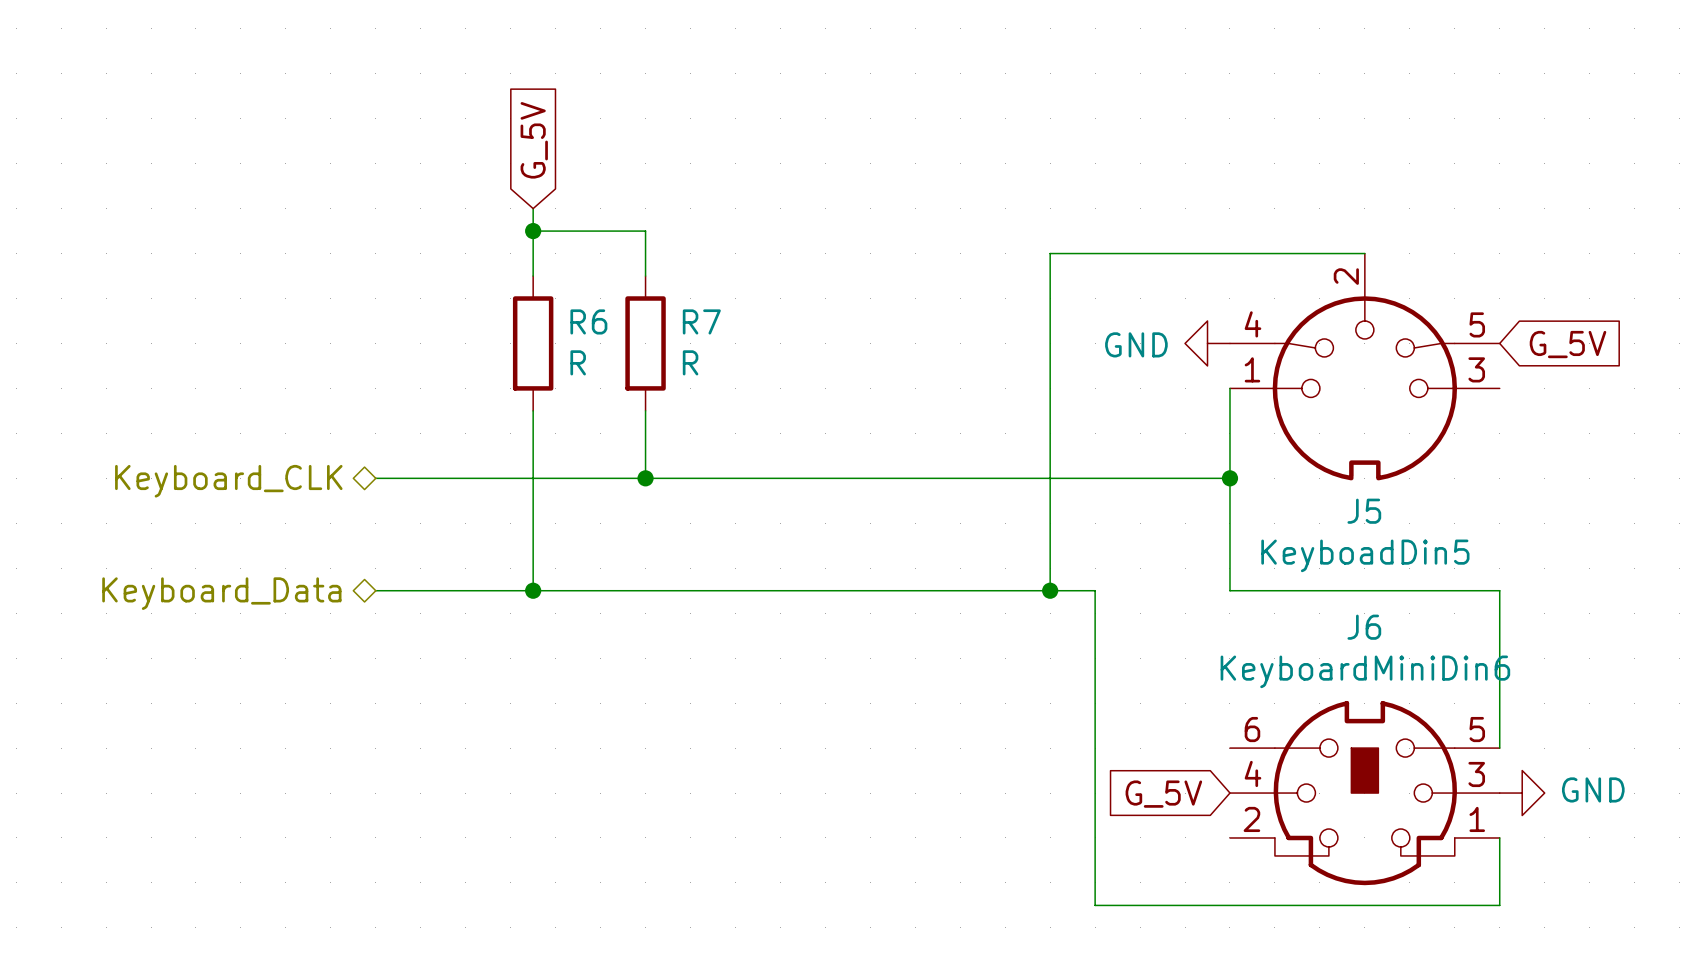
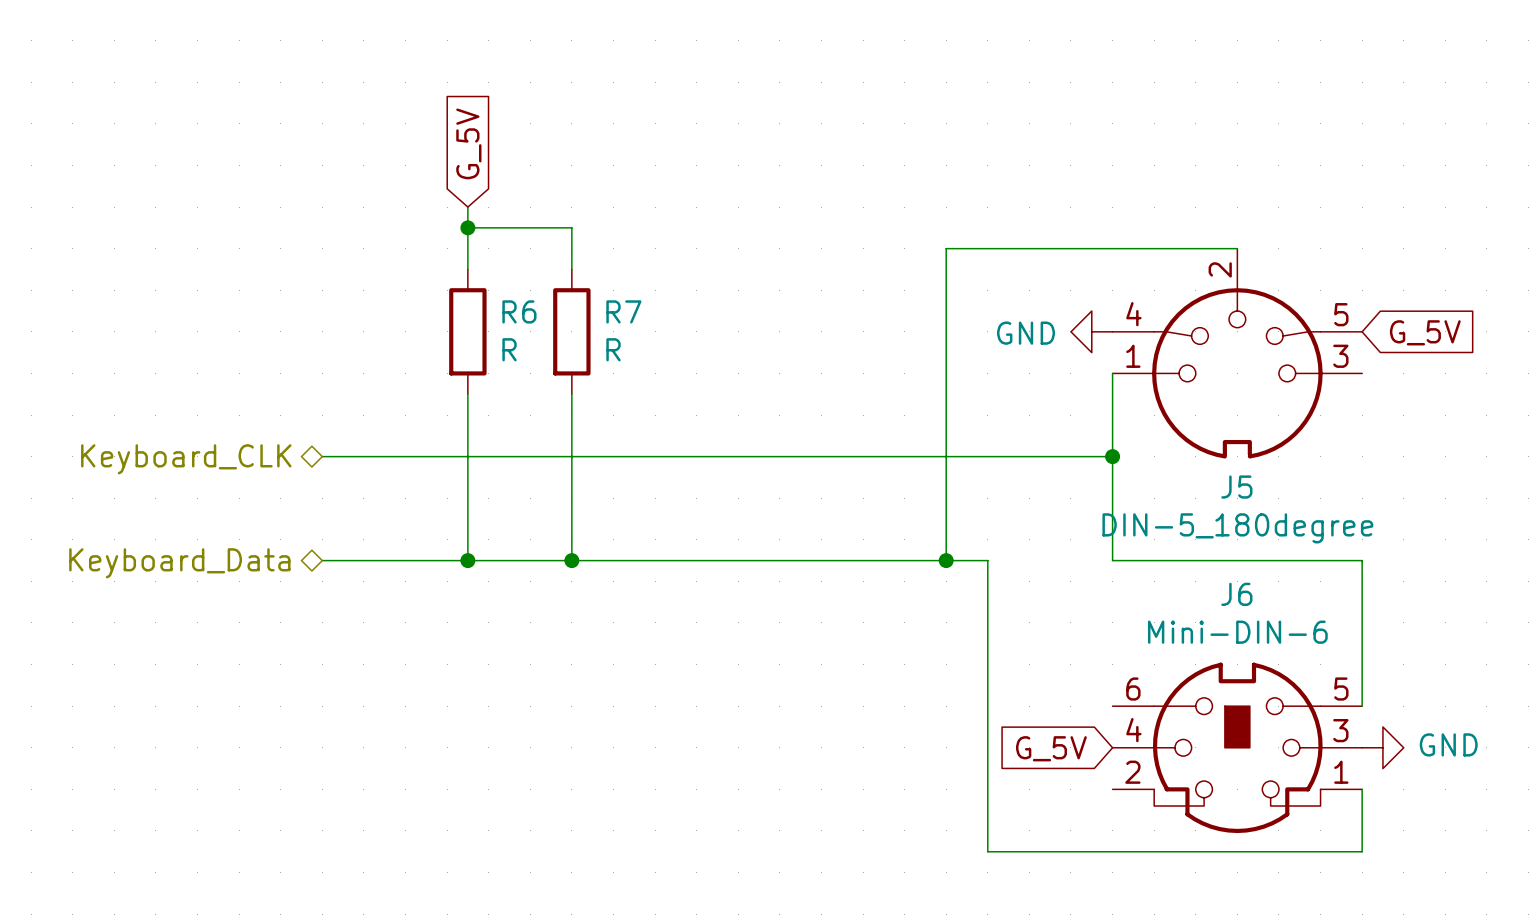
wire: none -> (571, 456) (571, 560)
junction: (645, 478) -> none
J5 value: KeyboadDin5 (1365, 555) -> DIN-5_180degree (1237, 528)
junction: none -> (571, 560)
J6 value: KeyboardMiniDin6 (1365, 671) -> Mini-DIN-6 (1237, 632)

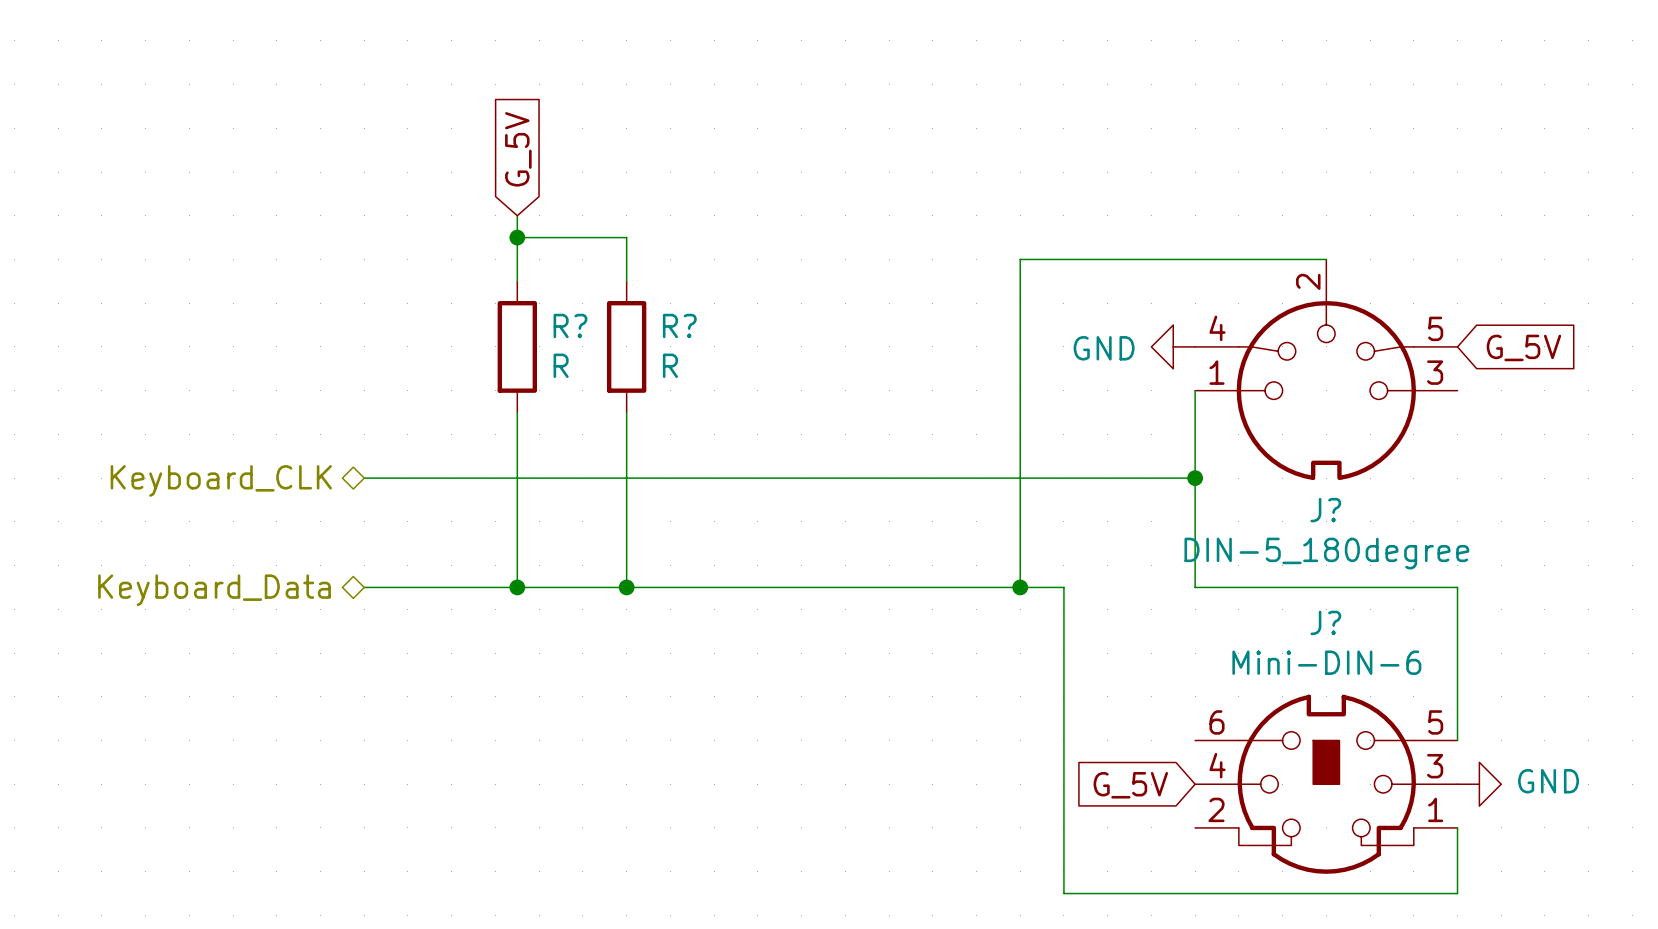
R6 name: R6 (519, 311) -> R? (570, 325)
R7 name: R7 (623, 311) -> R? (679, 325)
J5 name: J5 (1236, 487) -> J? (1325, 510)
J6 name: J6 (1236, 594) -> J? (1325, 622)

